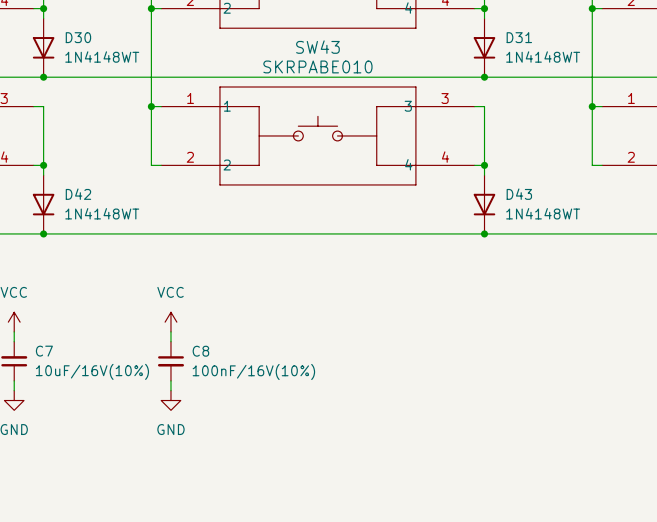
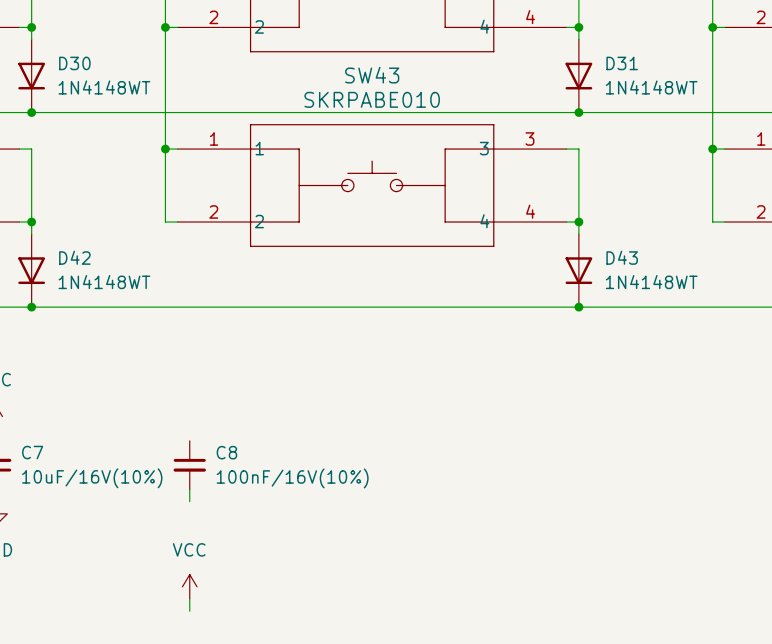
power symbol position: VCC (170, 322) -> VCC (189, 586)
wire: (170, 331) (170, 341) -> (189, 599) (189, 611)
power symbol: GND (170, 400) -> none

